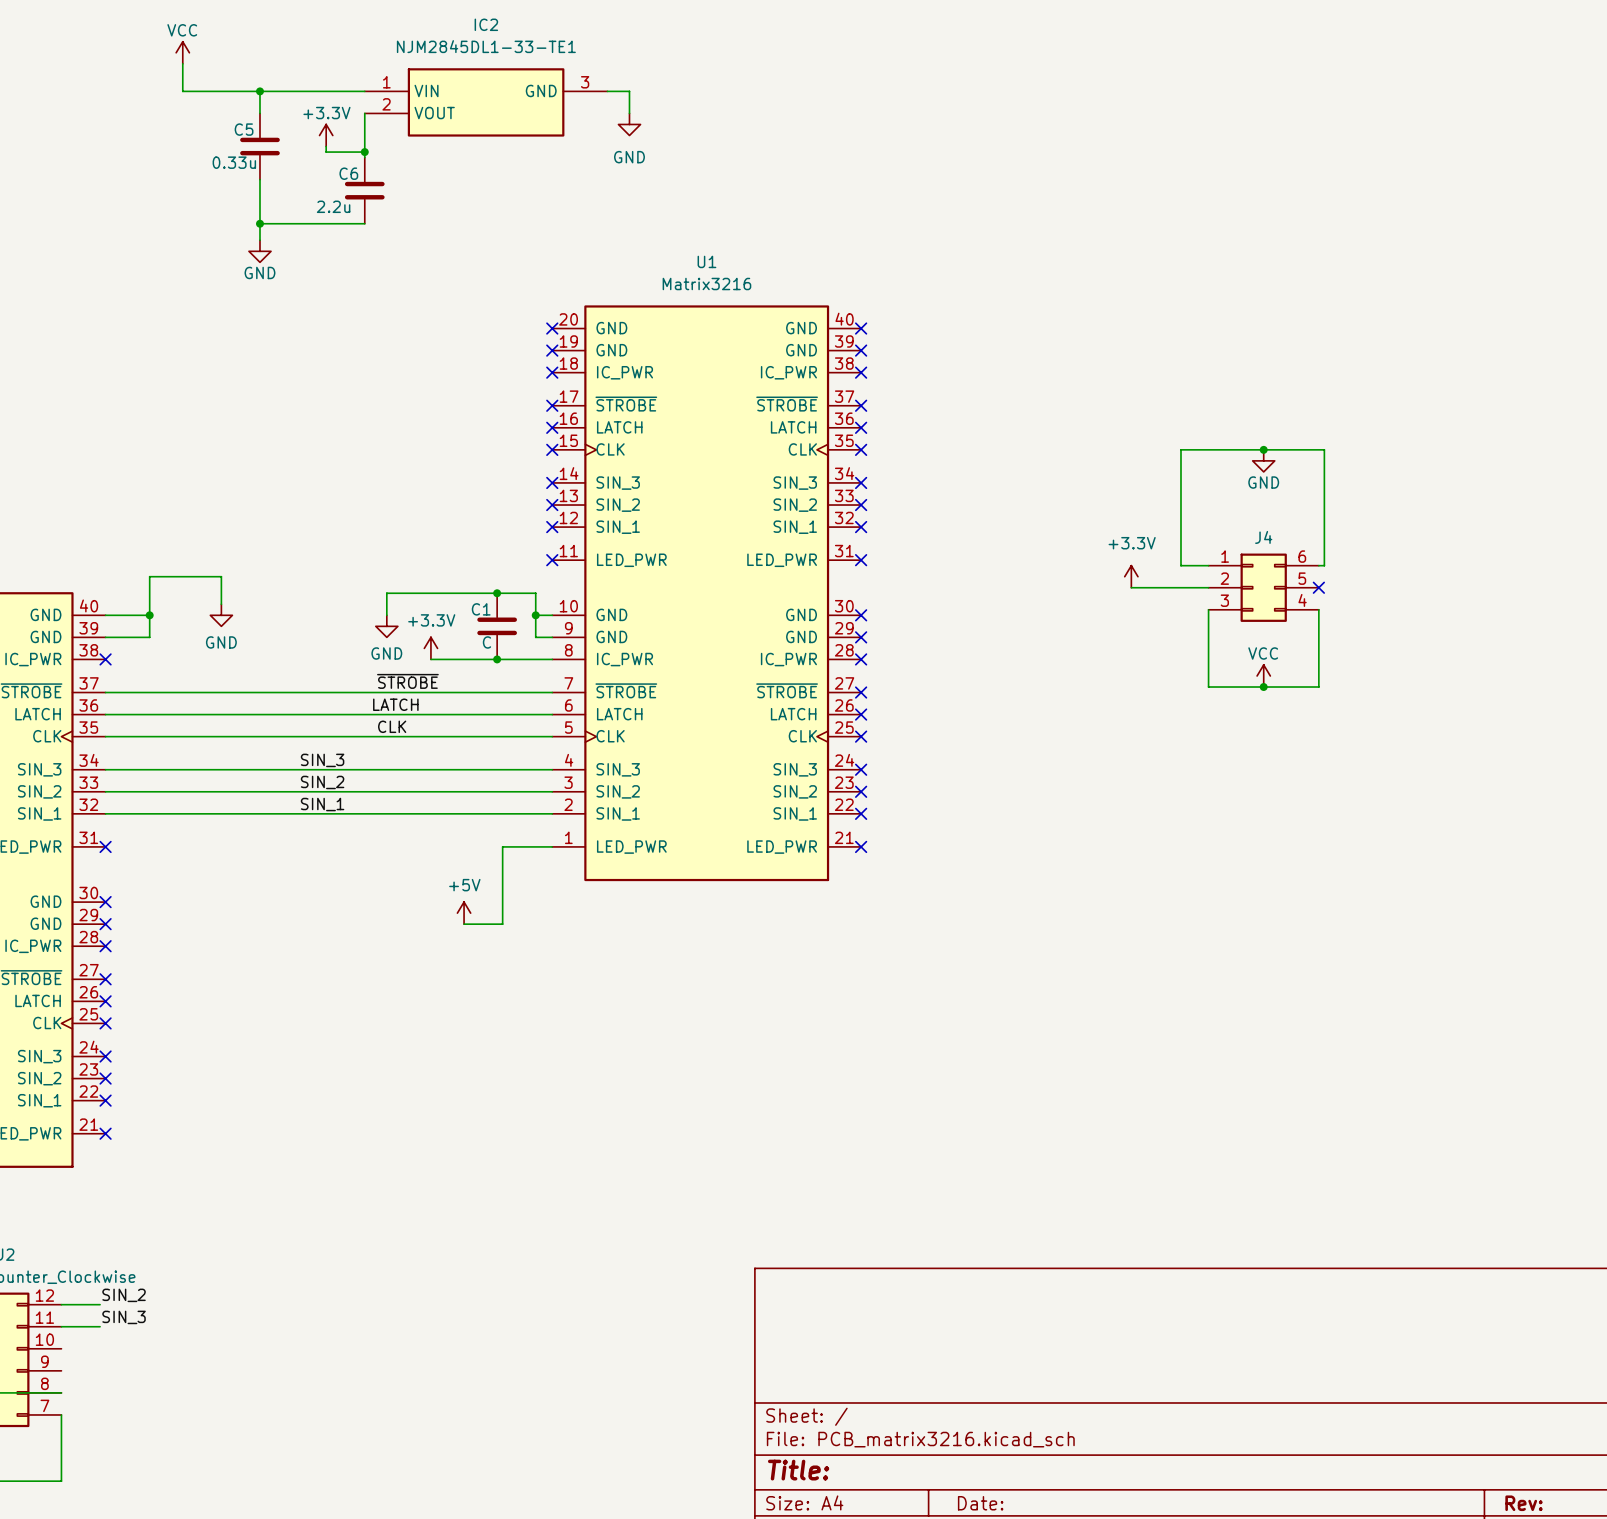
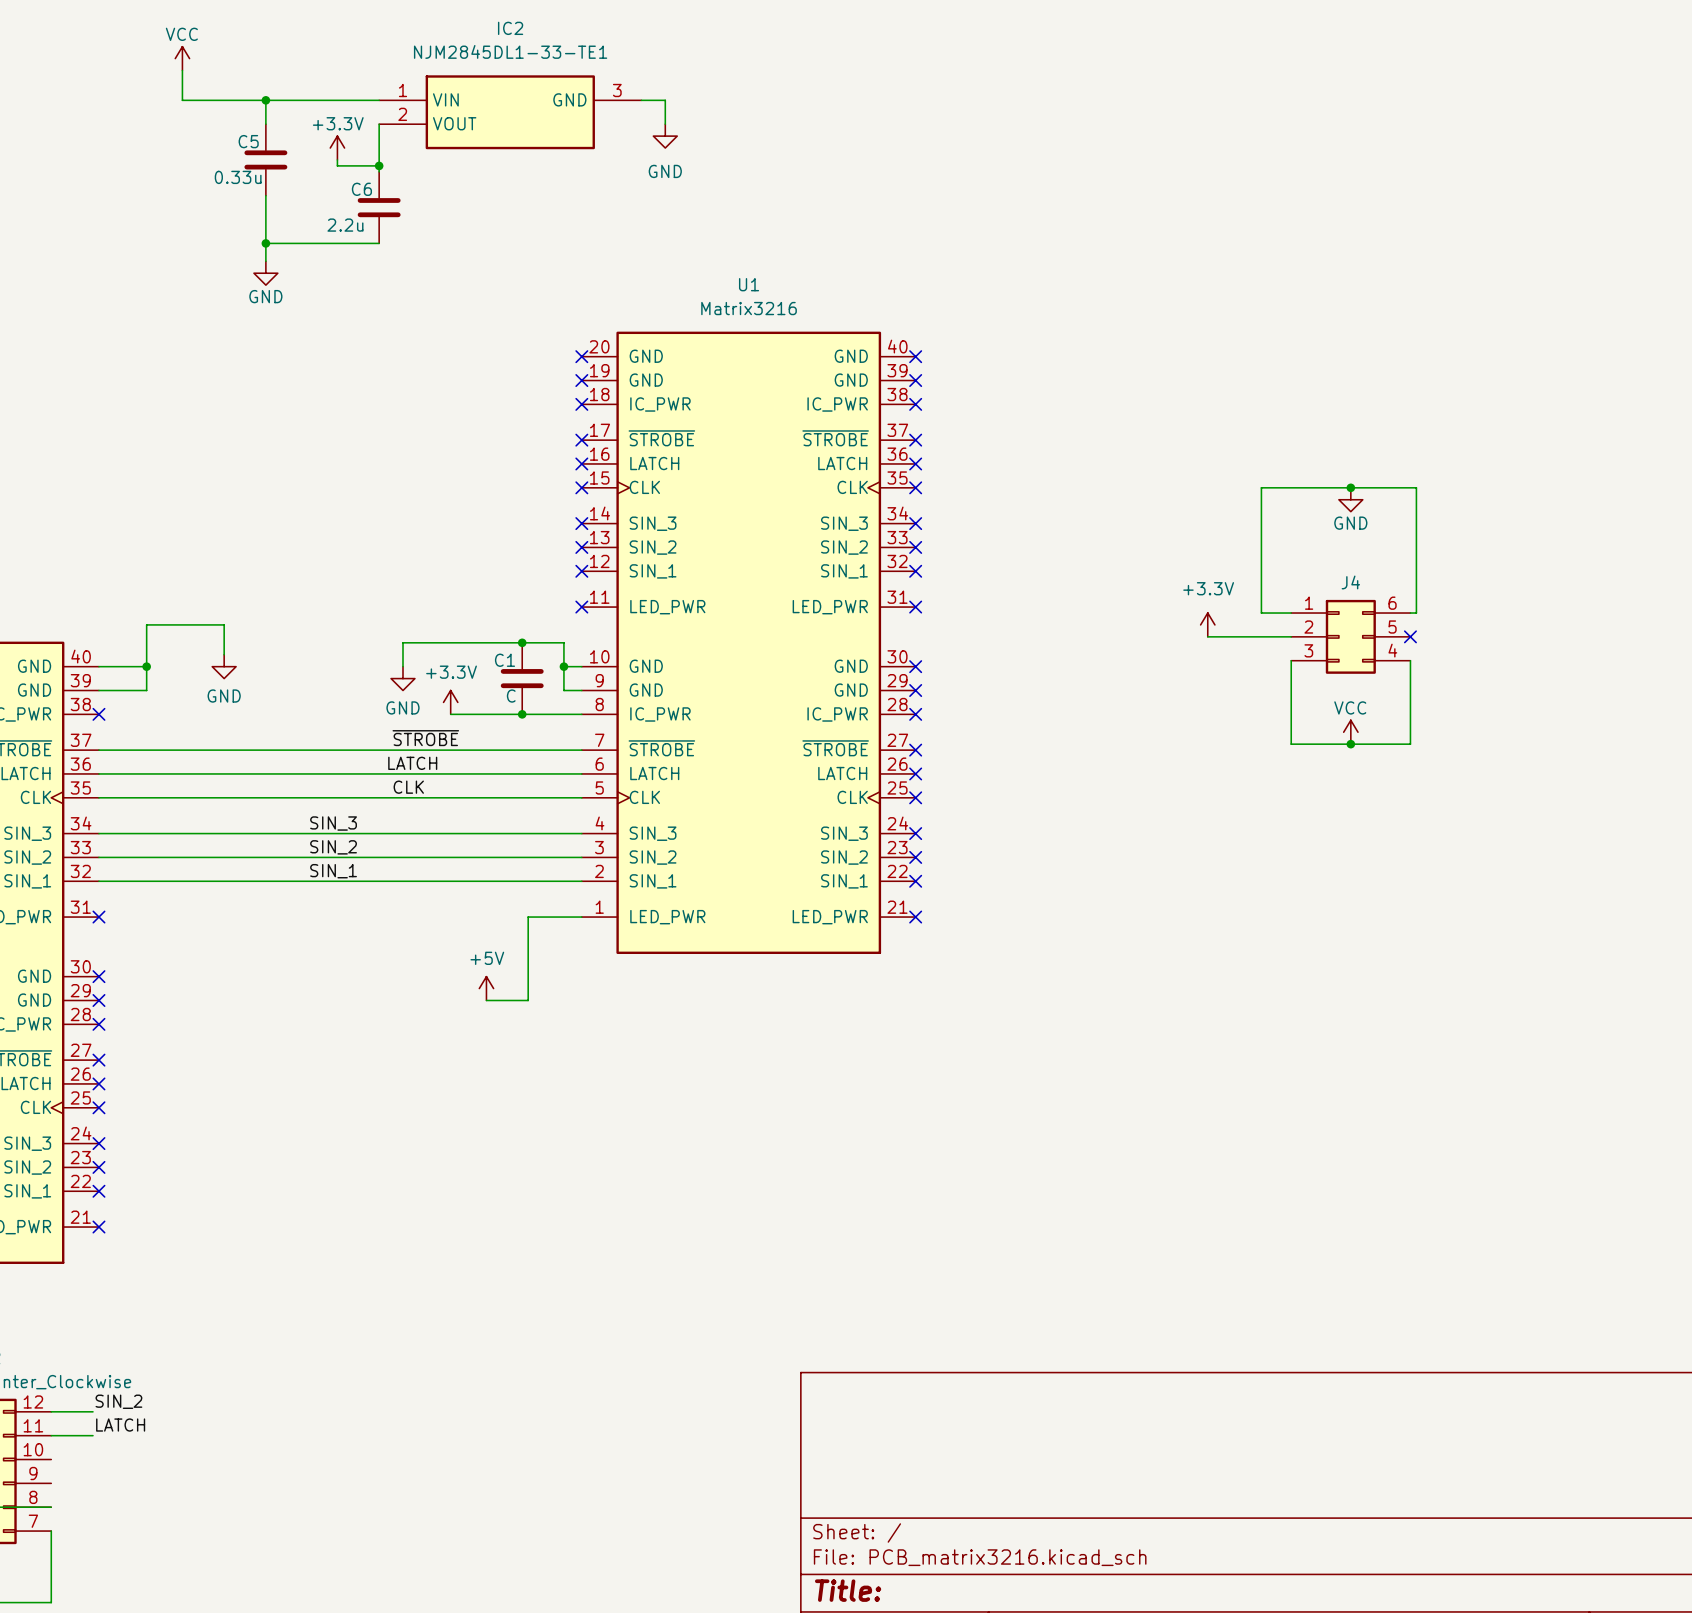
label: SIN_3 (124, 1317) -> LATCH (120, 1425)

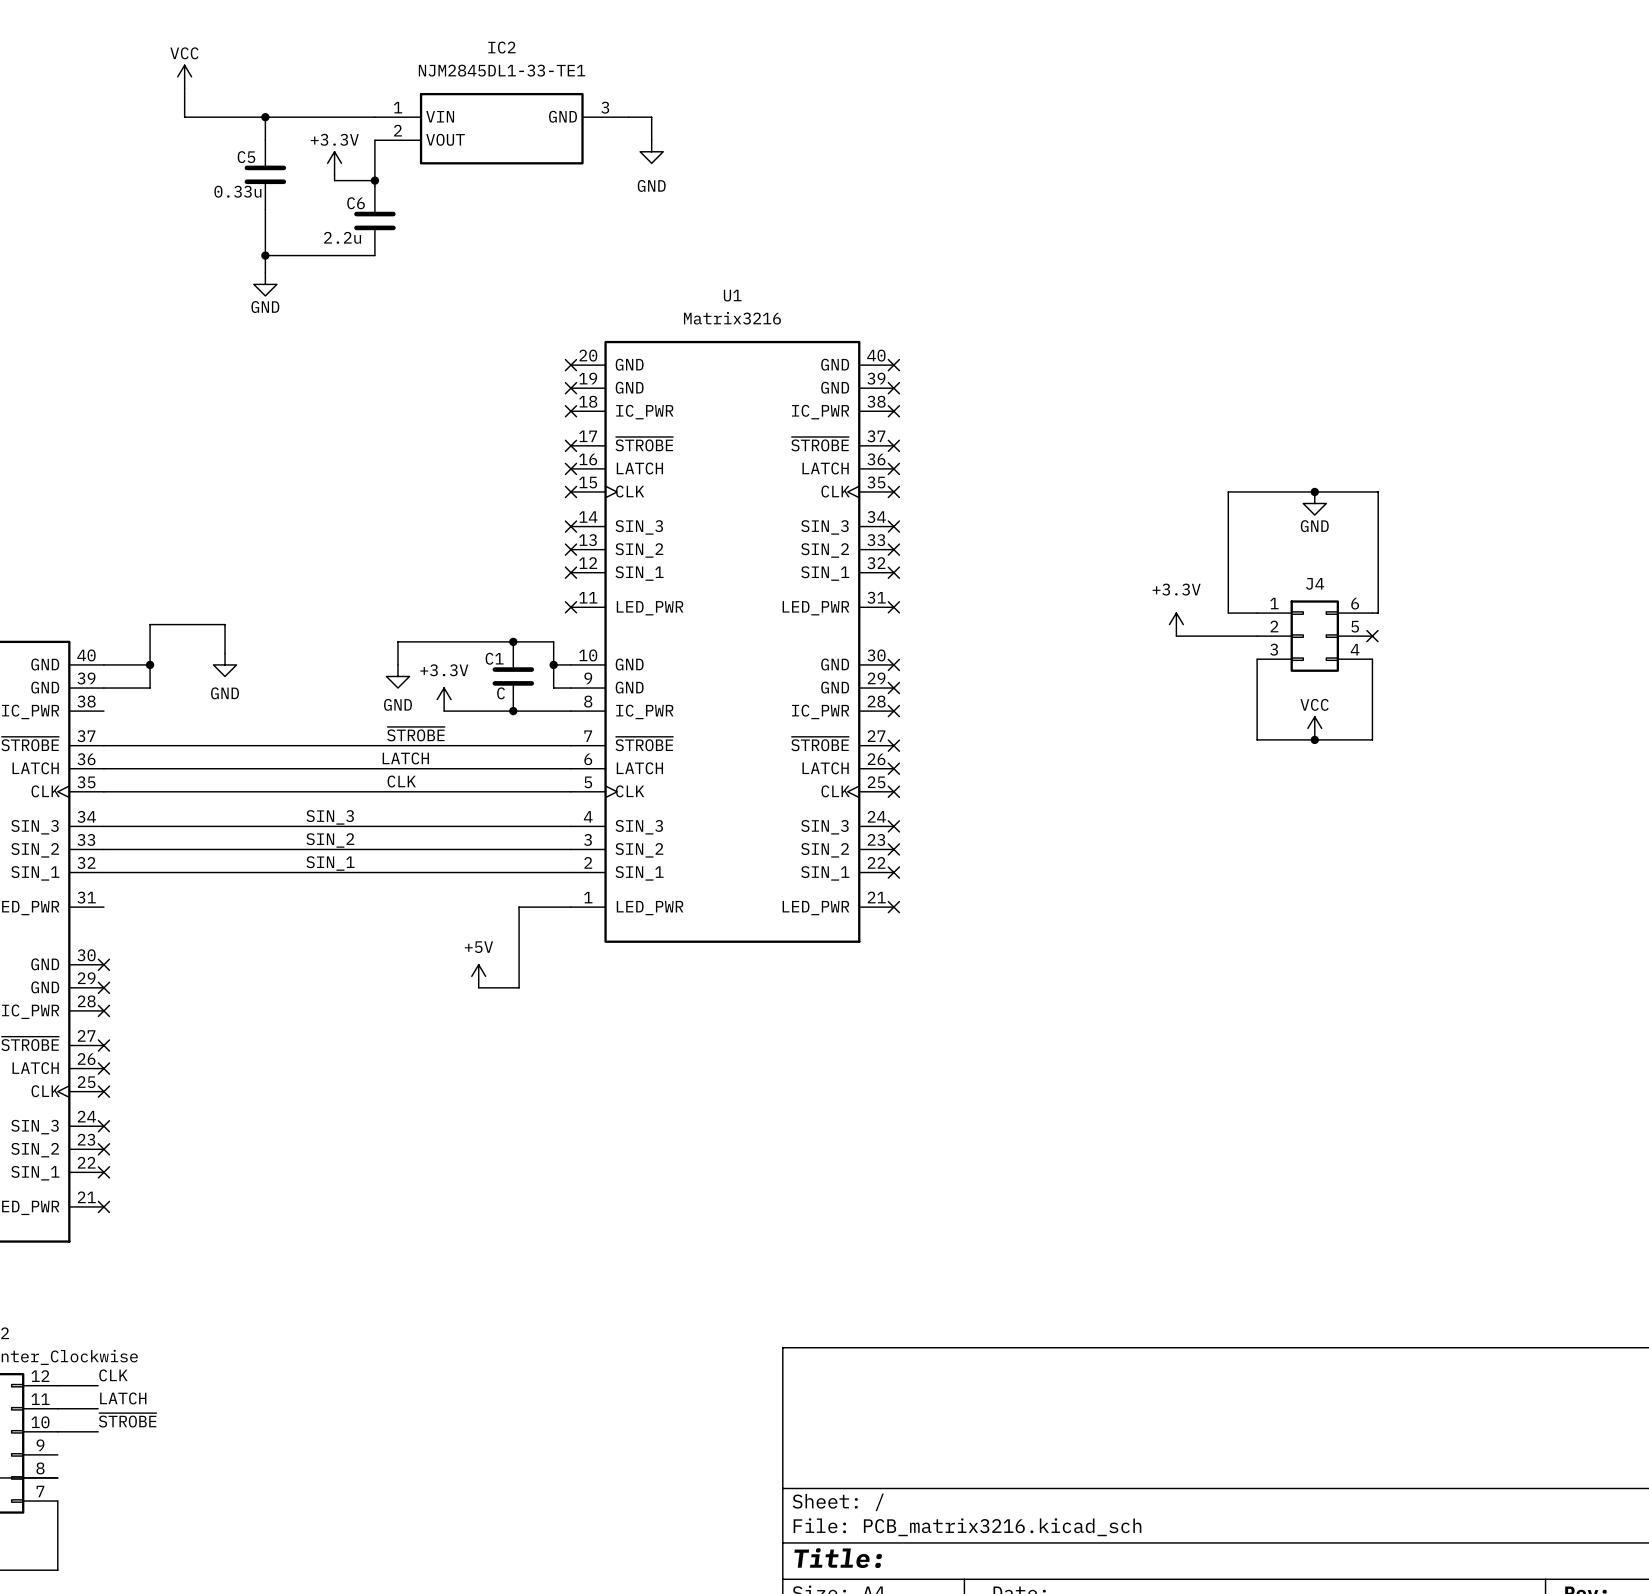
no-connect mark: (98, 714) -> none
no-connect mark: (98, 917) -> none
label: SIN_2 (118, 1401) -> CLK (113, 1375)
label: none -> ~{STROBE} (127, 1420)
wire: none -> (57, 1431) (98, 1431)

